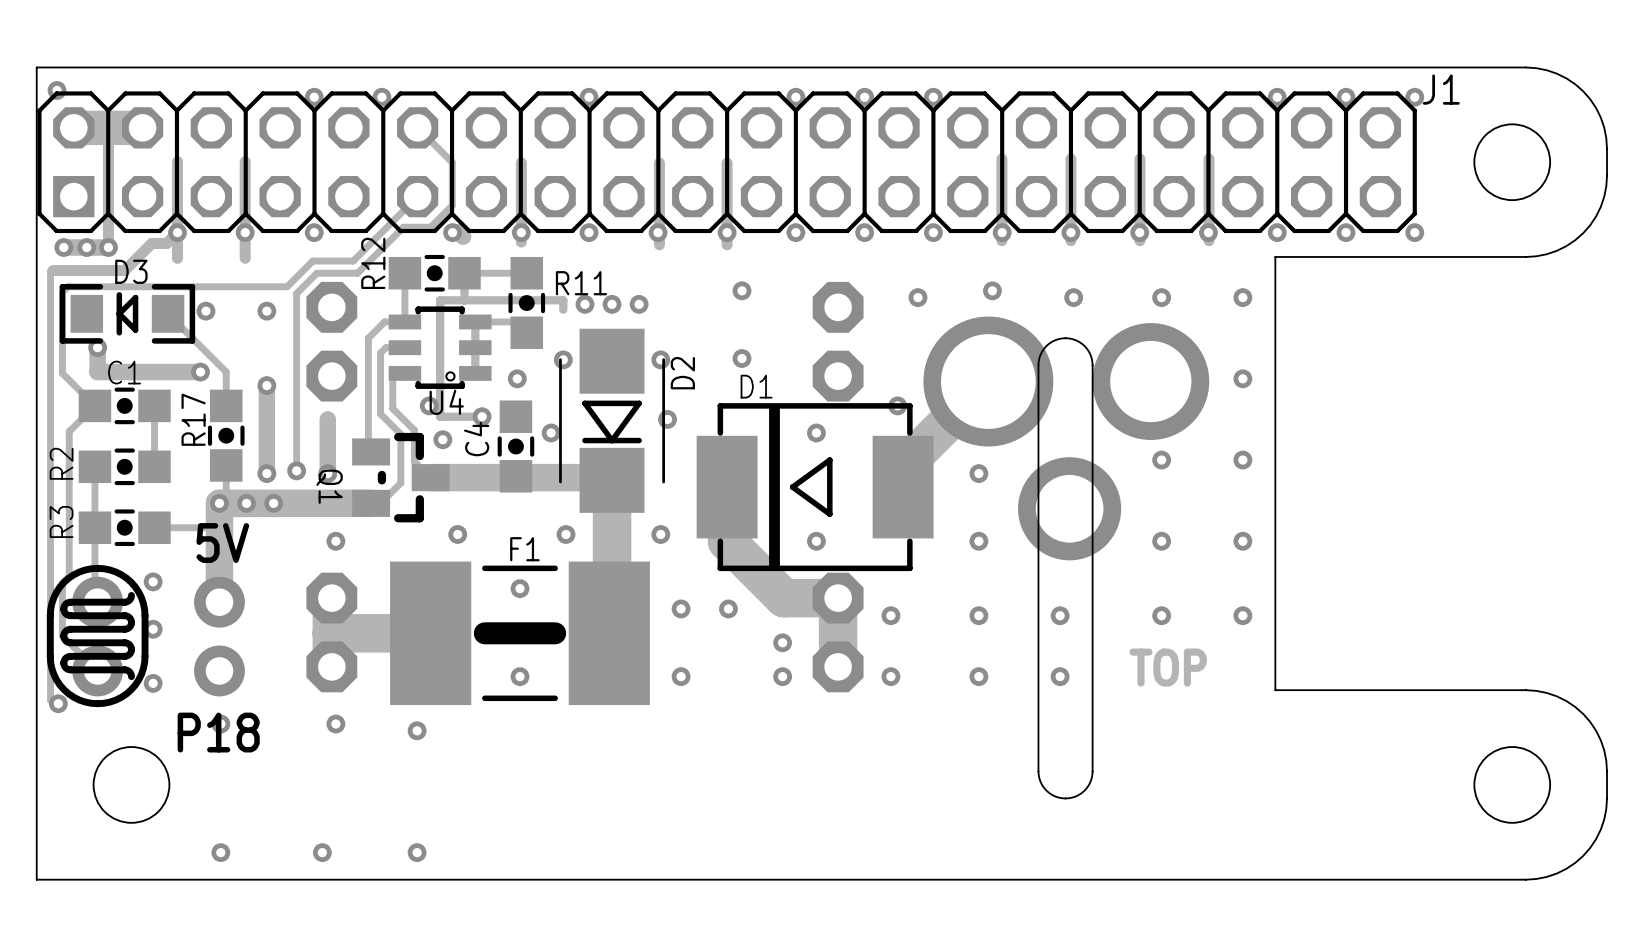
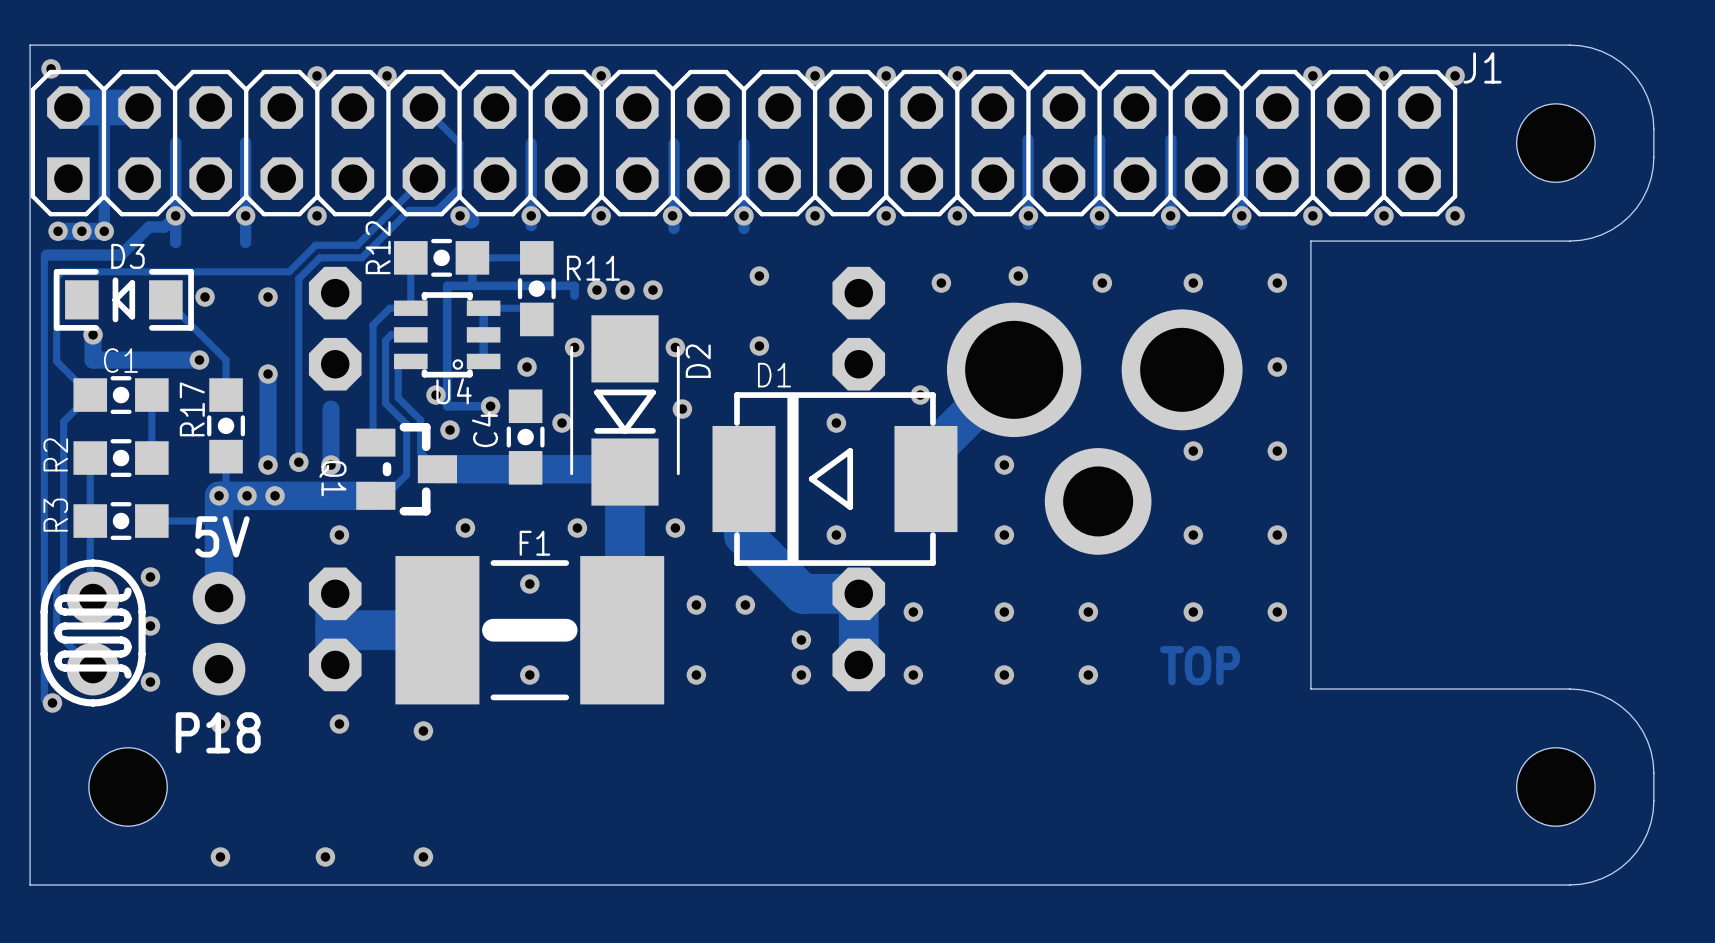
board edge: (1065, 338) (1055, 340) (1046, 346) (1040, 354) (1038, 365) (1038, 771) (1040, 781) (1046, 790) (1055, 796) (1065, 798) (1075, 796) (1084, 790) (1090, 781) (1092, 771) (1092, 365) (1090, 354) (1084, 346) (1075, 340) (1065, 338) -> none

